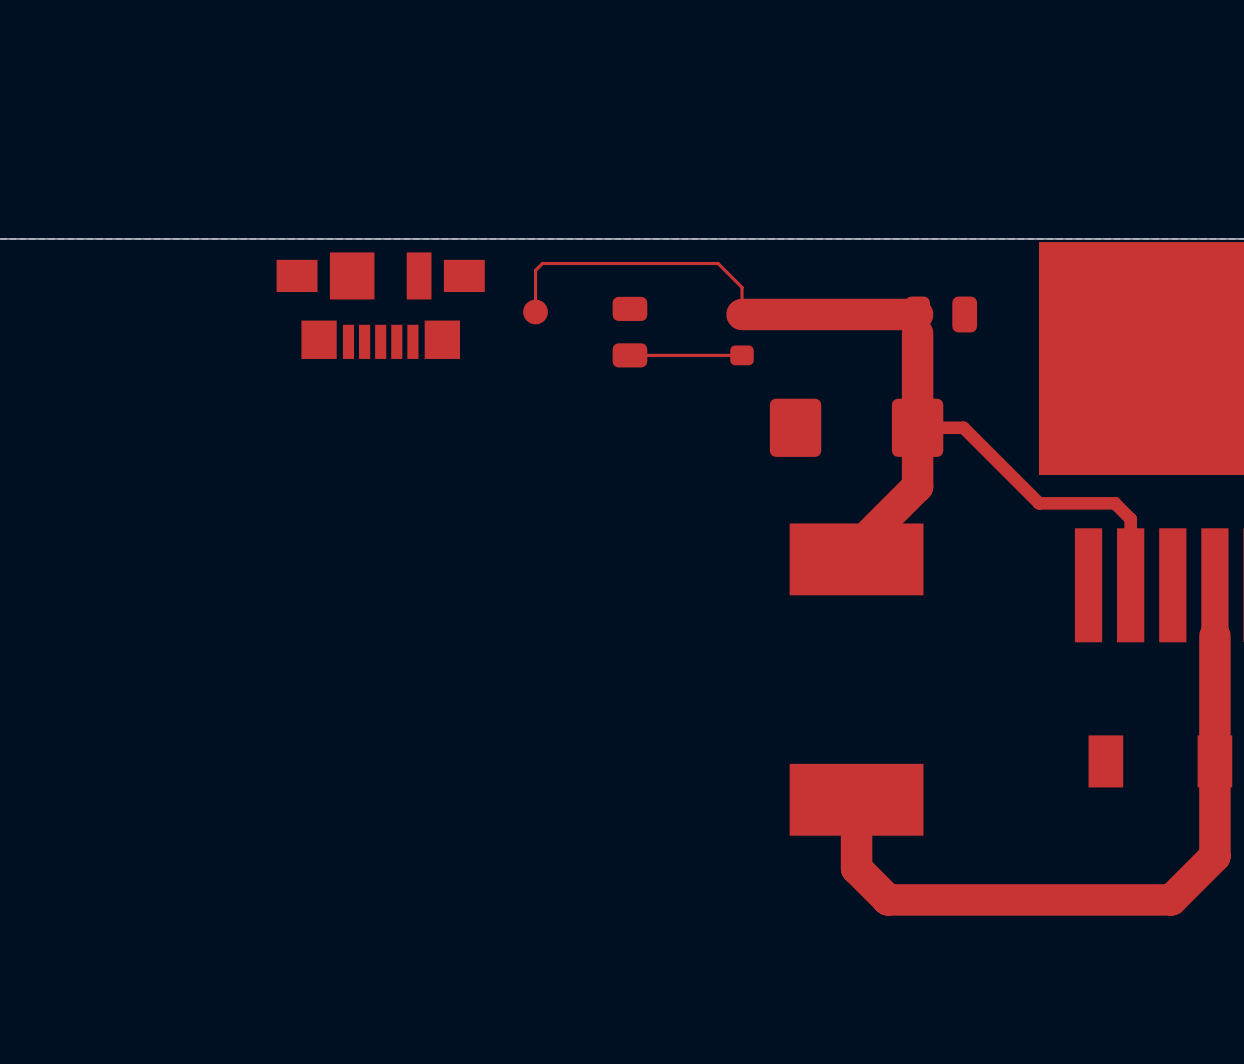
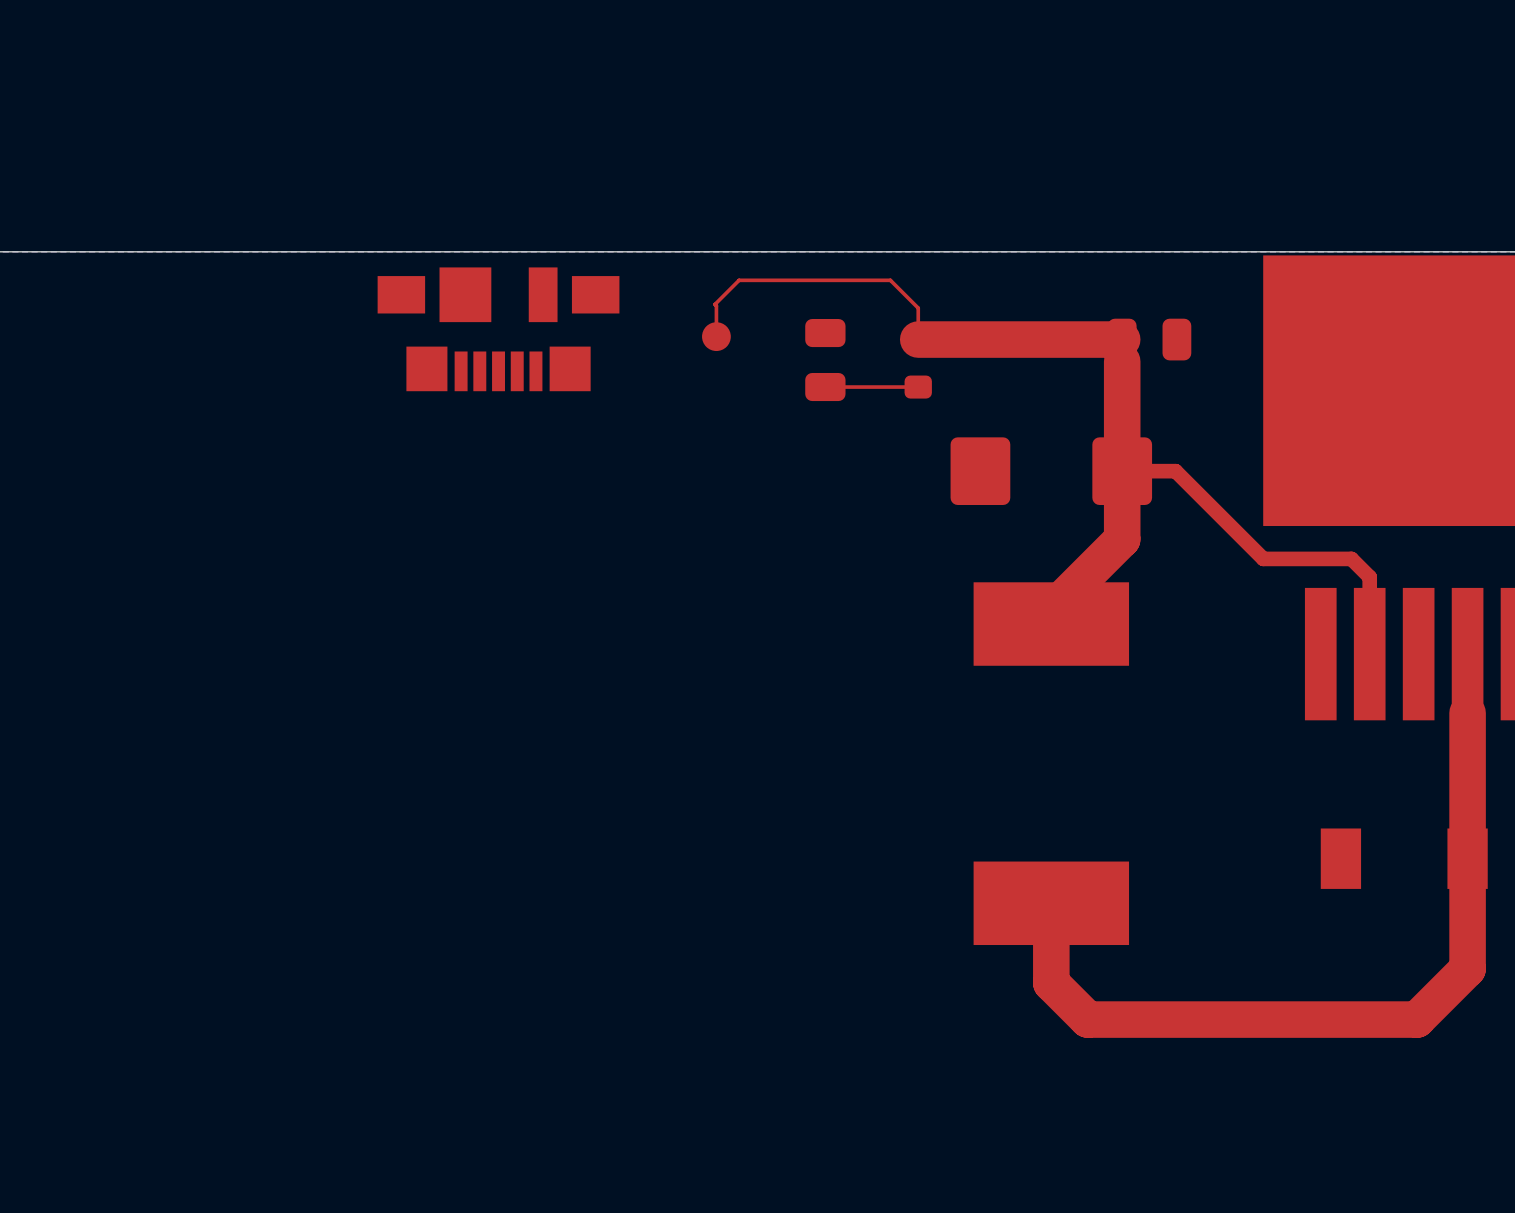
top track: (587, 263) (542, 263) (535, 270) (535, 311) -> (739, 280) (714, 304) (716, 336)
part position: (535, 311) -> (716, 336)
part position: (629, 332) -> (825, 360)
top track: (662, 355) (629, 355) -> none

